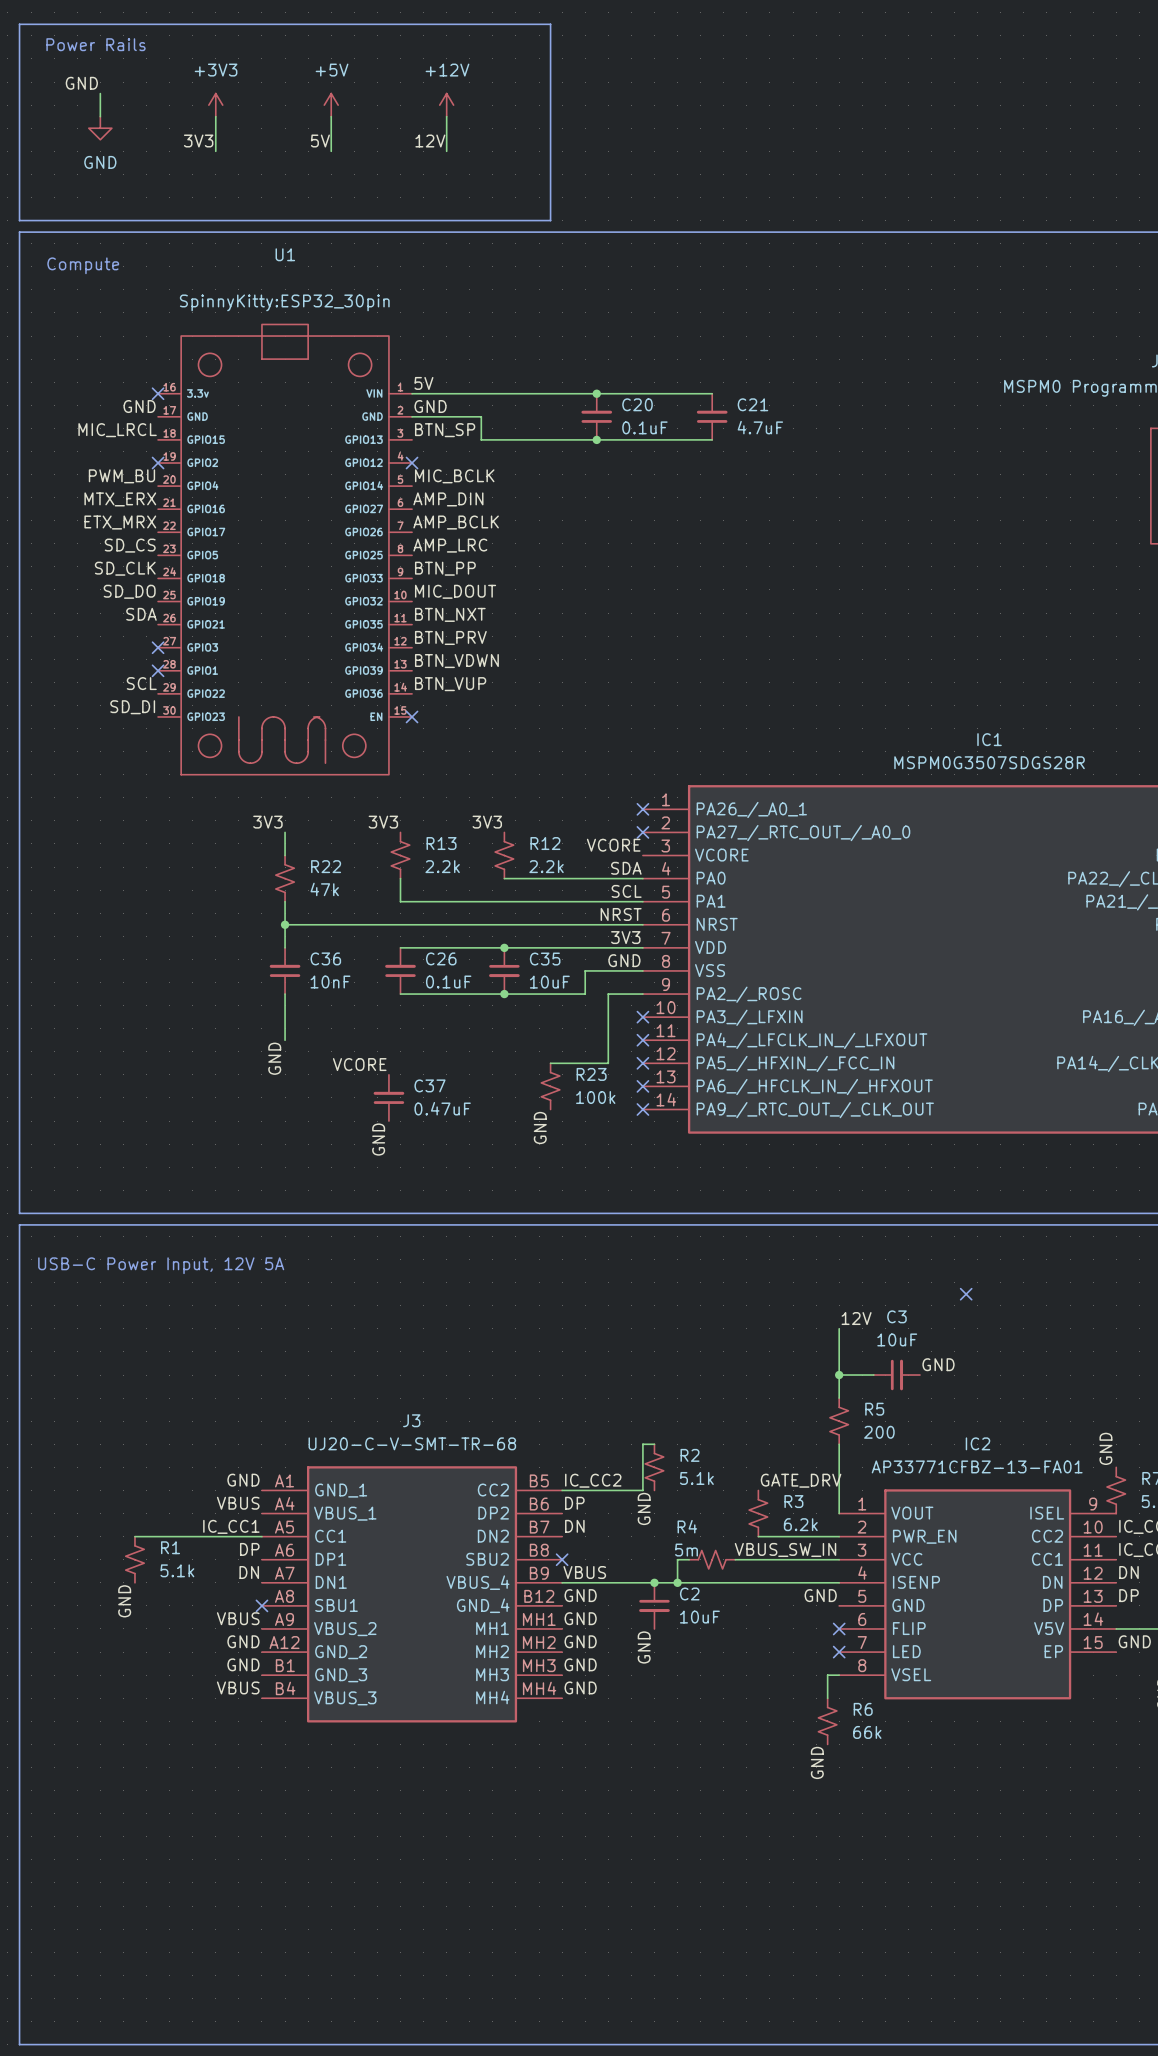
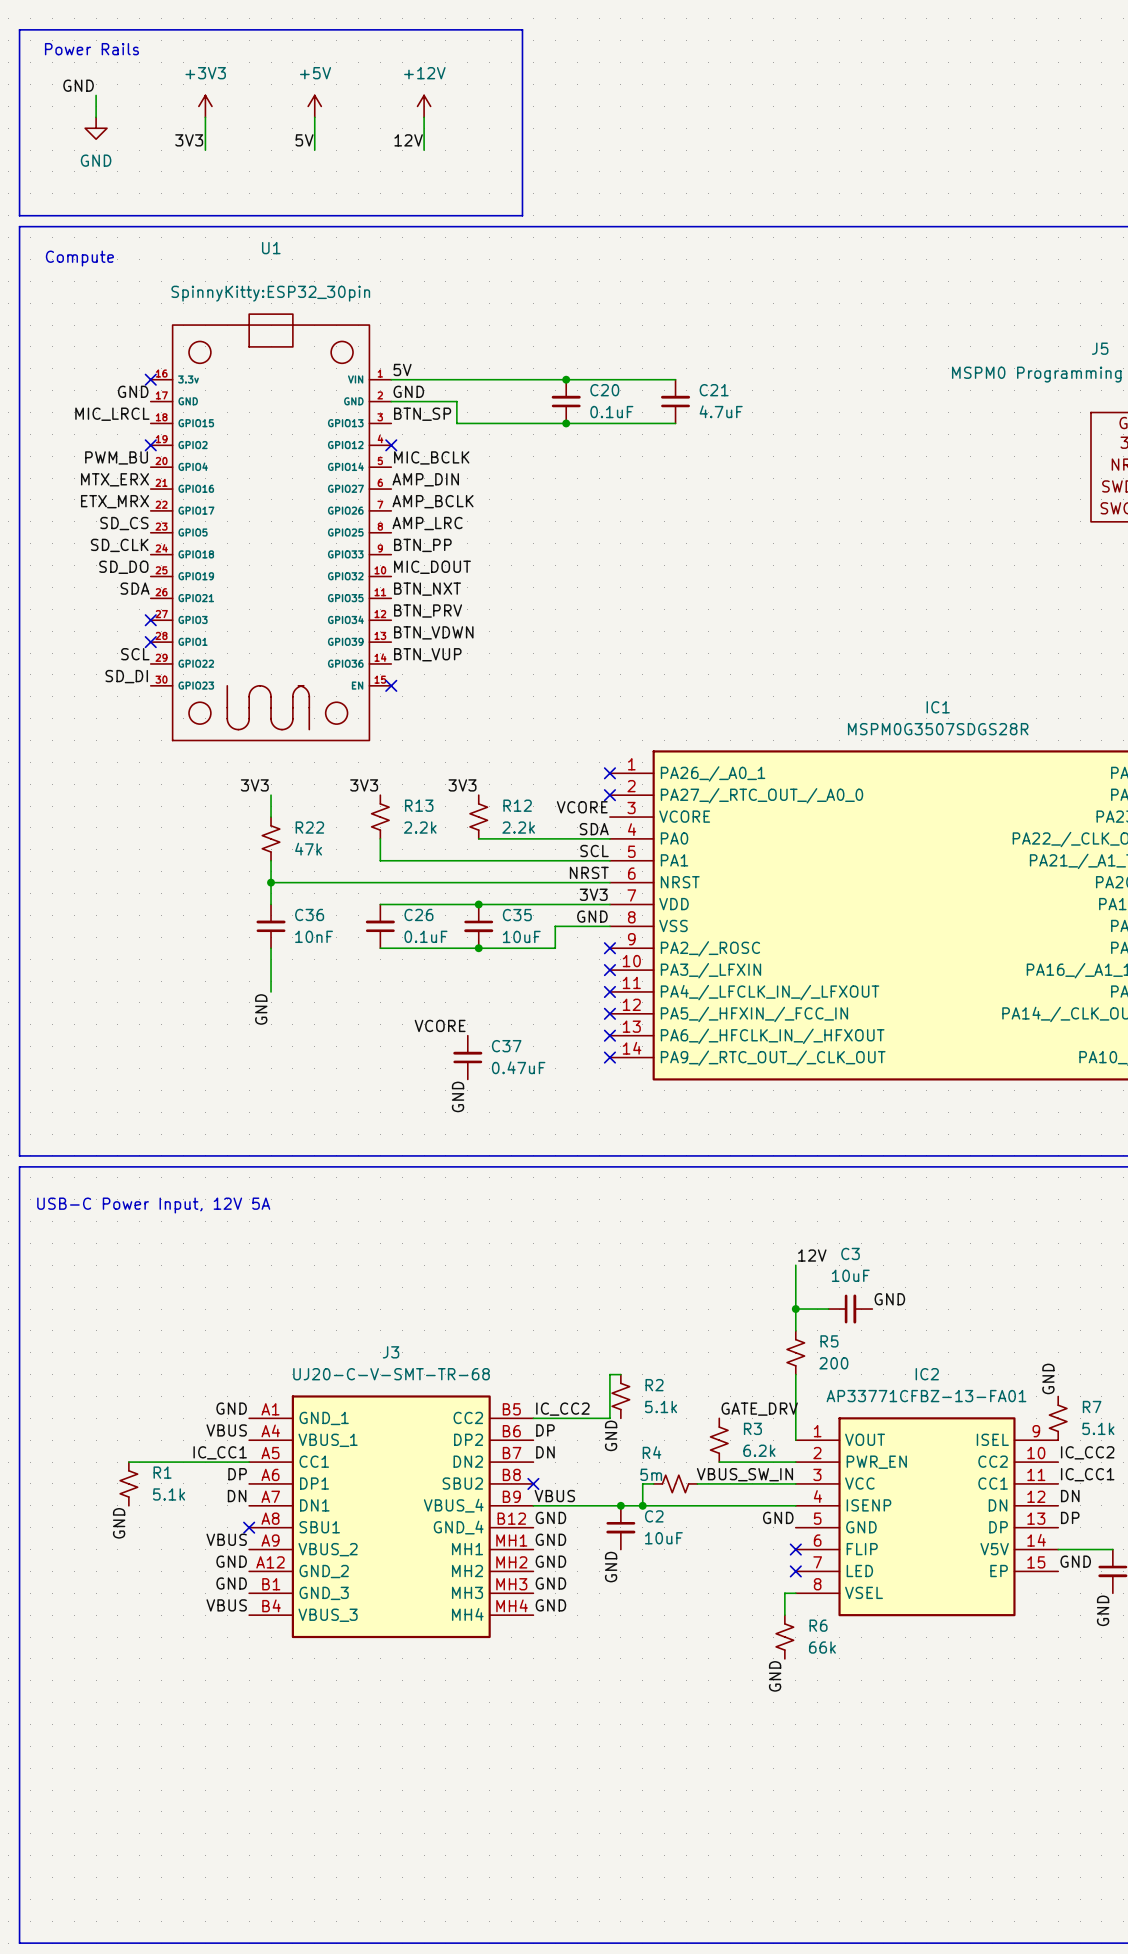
wire: (642, 994) (608, 994) (608, 1063) (550, 1063) -> none
no-connect mark: none -> (609, 948)
label position: VCORE (359, 1064) -> VCORE (440, 1025)
R23: 100k (550, 1086) -> none
C37 position: (388, 1097) -> (467, 1057)
label: GND (540, 1127) -> none
label: GND (378, 1139) -> none
label: none -> GND (458, 1096)
no-connect mark: (966, 1294) -> none

